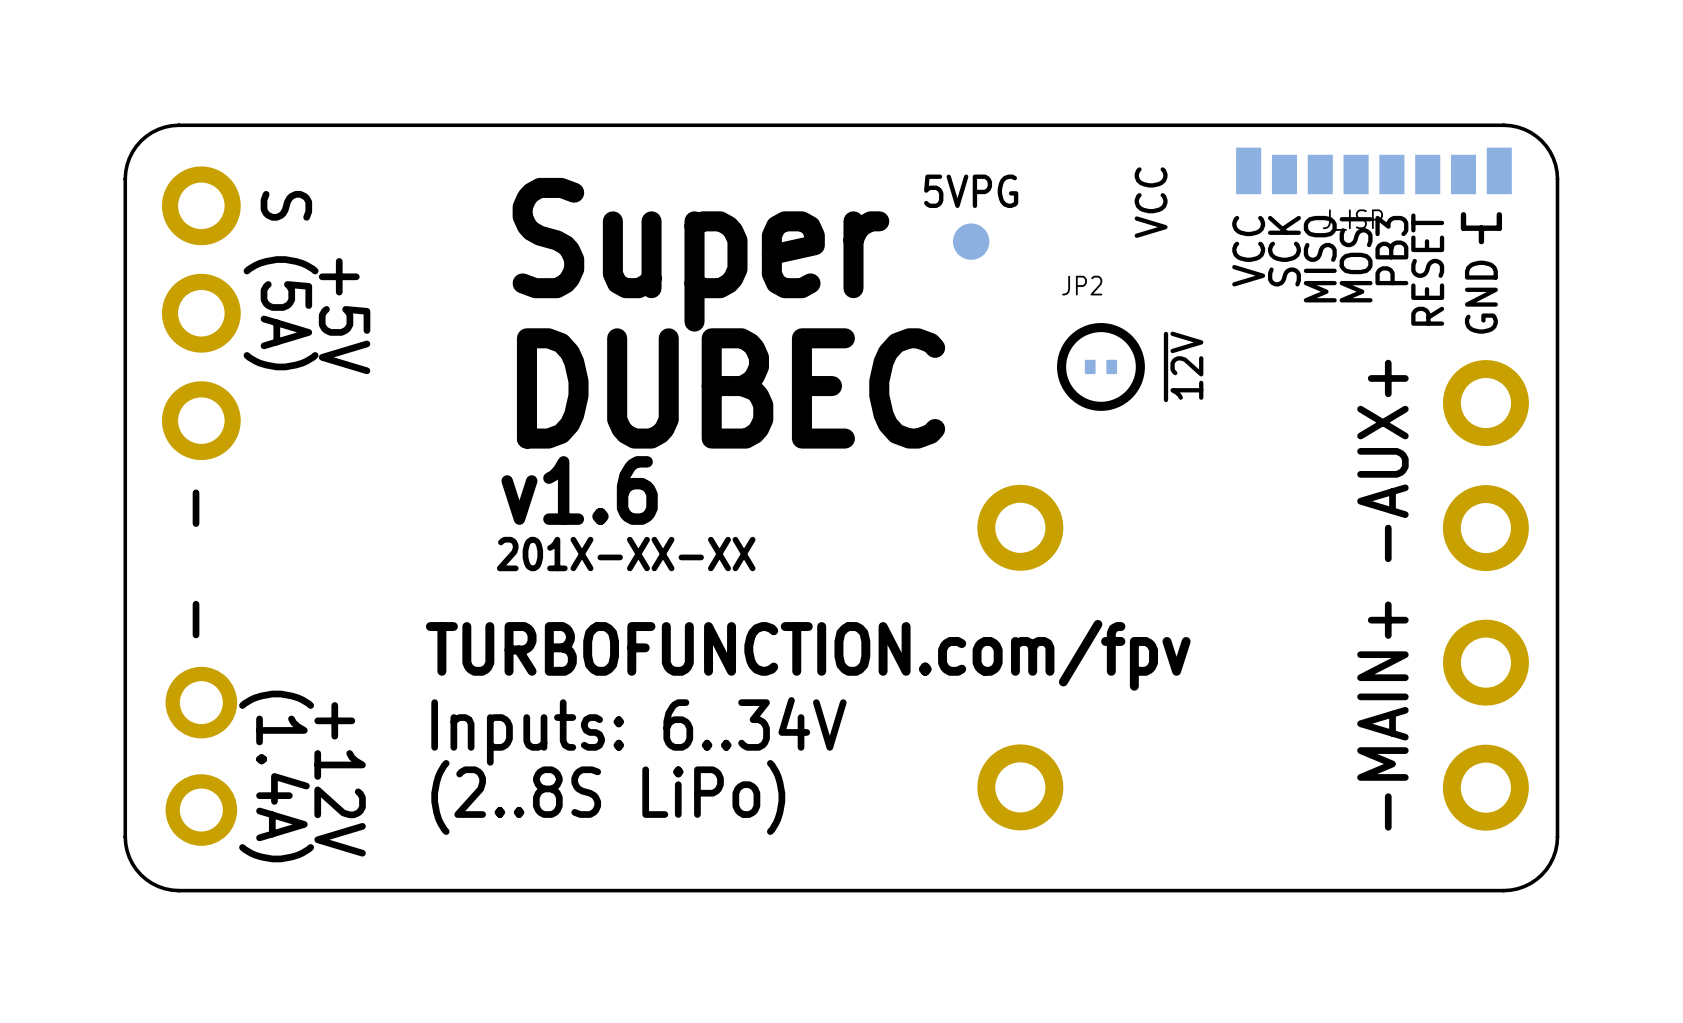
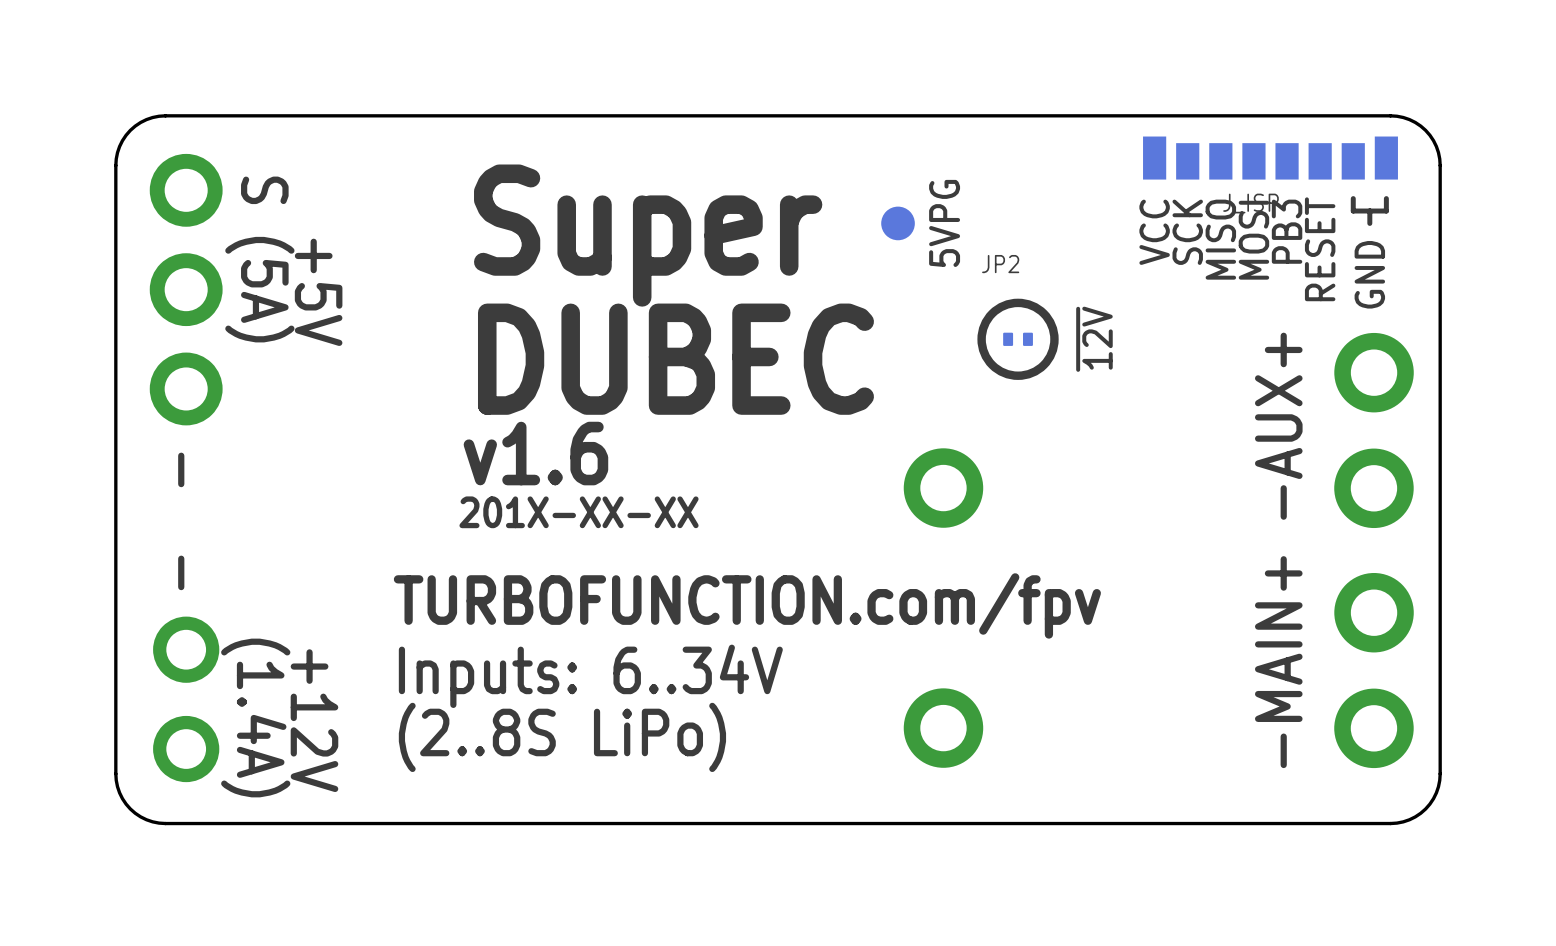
text rotation: 0° (971, 191) -> 90° counterclockwise (944, 223)
text: VCC (1151, 202) -> none

